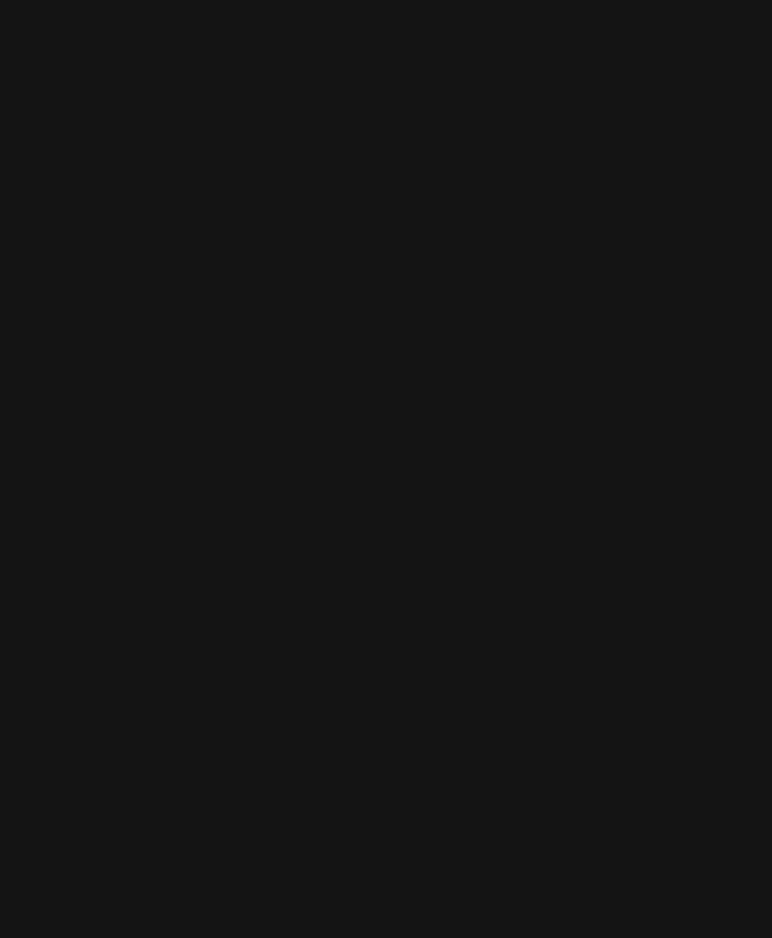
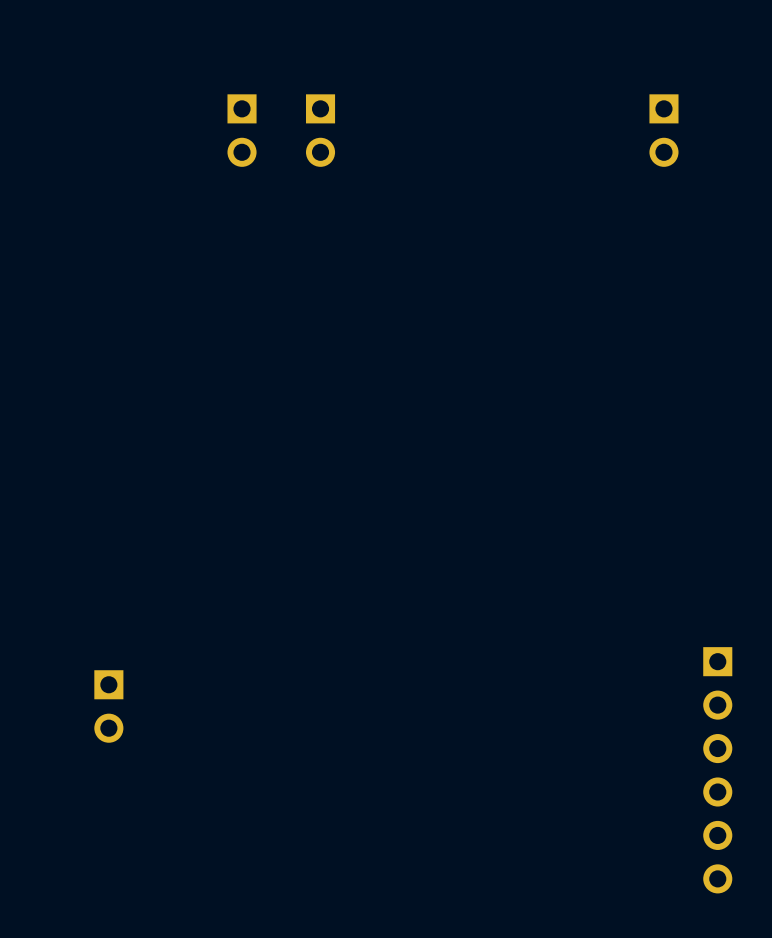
part: none -> (242, 130)
part: none -> (320, 130)
part: none -> (663, 130)
part: none -> (108, 706)
part: none -> (717, 770)

